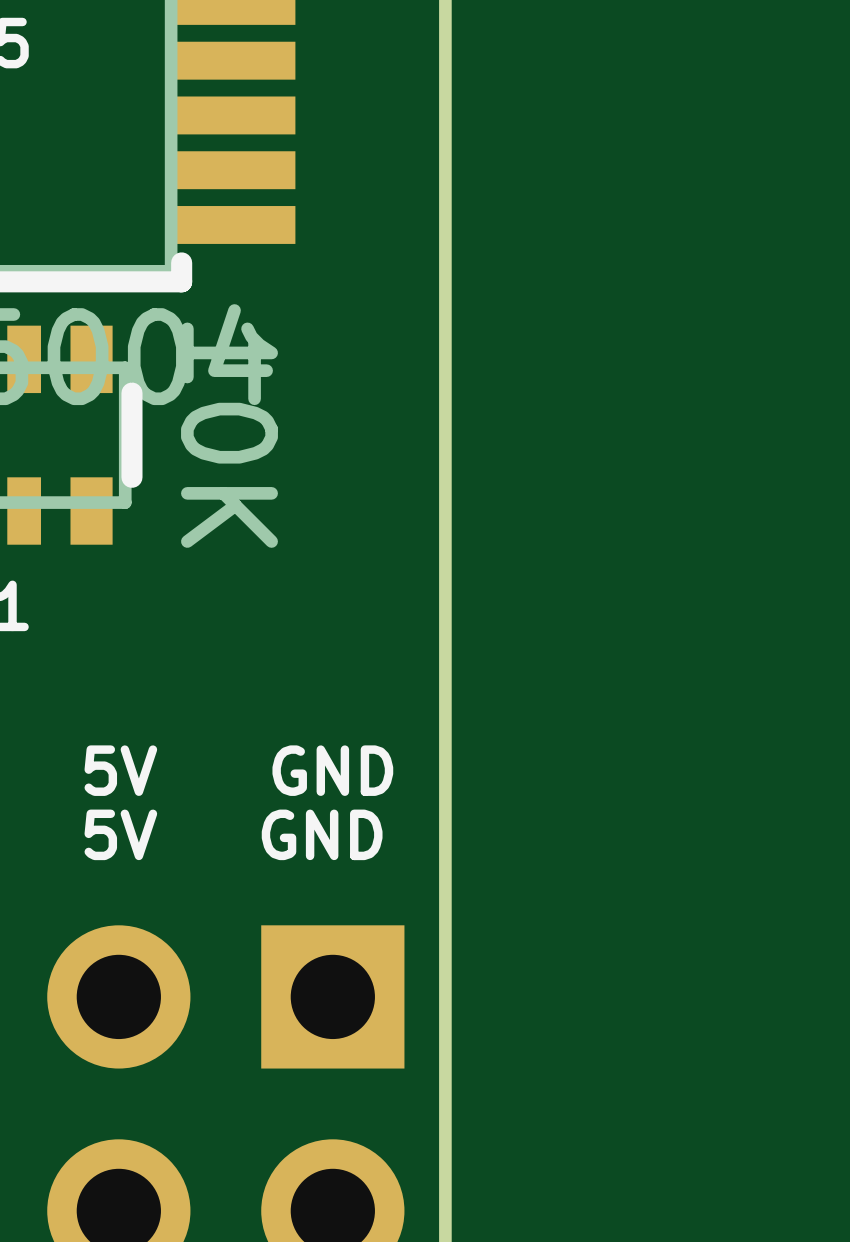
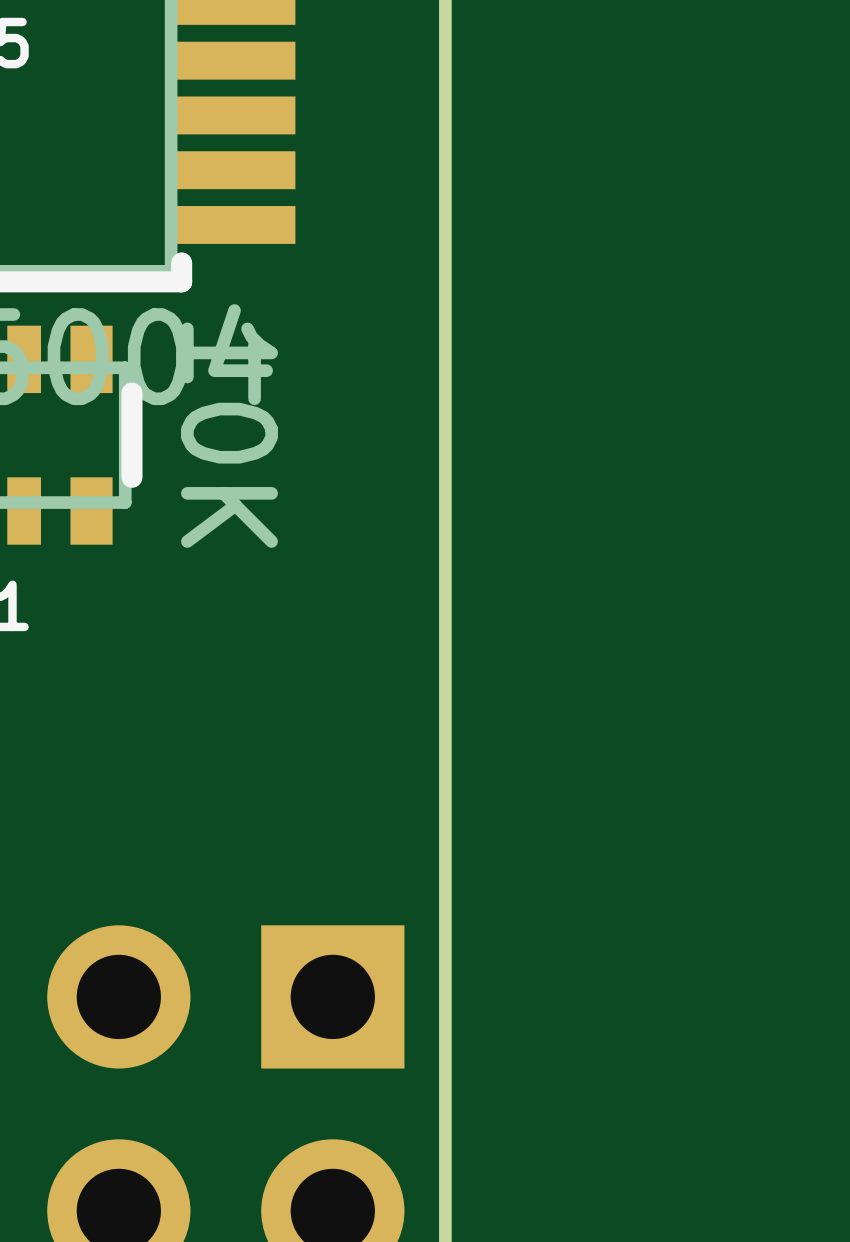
text: 5V (120, 770) -> none
text: GND (332, 770) -> none
text: 5V (120, 834) -> none
text: GND (322, 834) -> none

